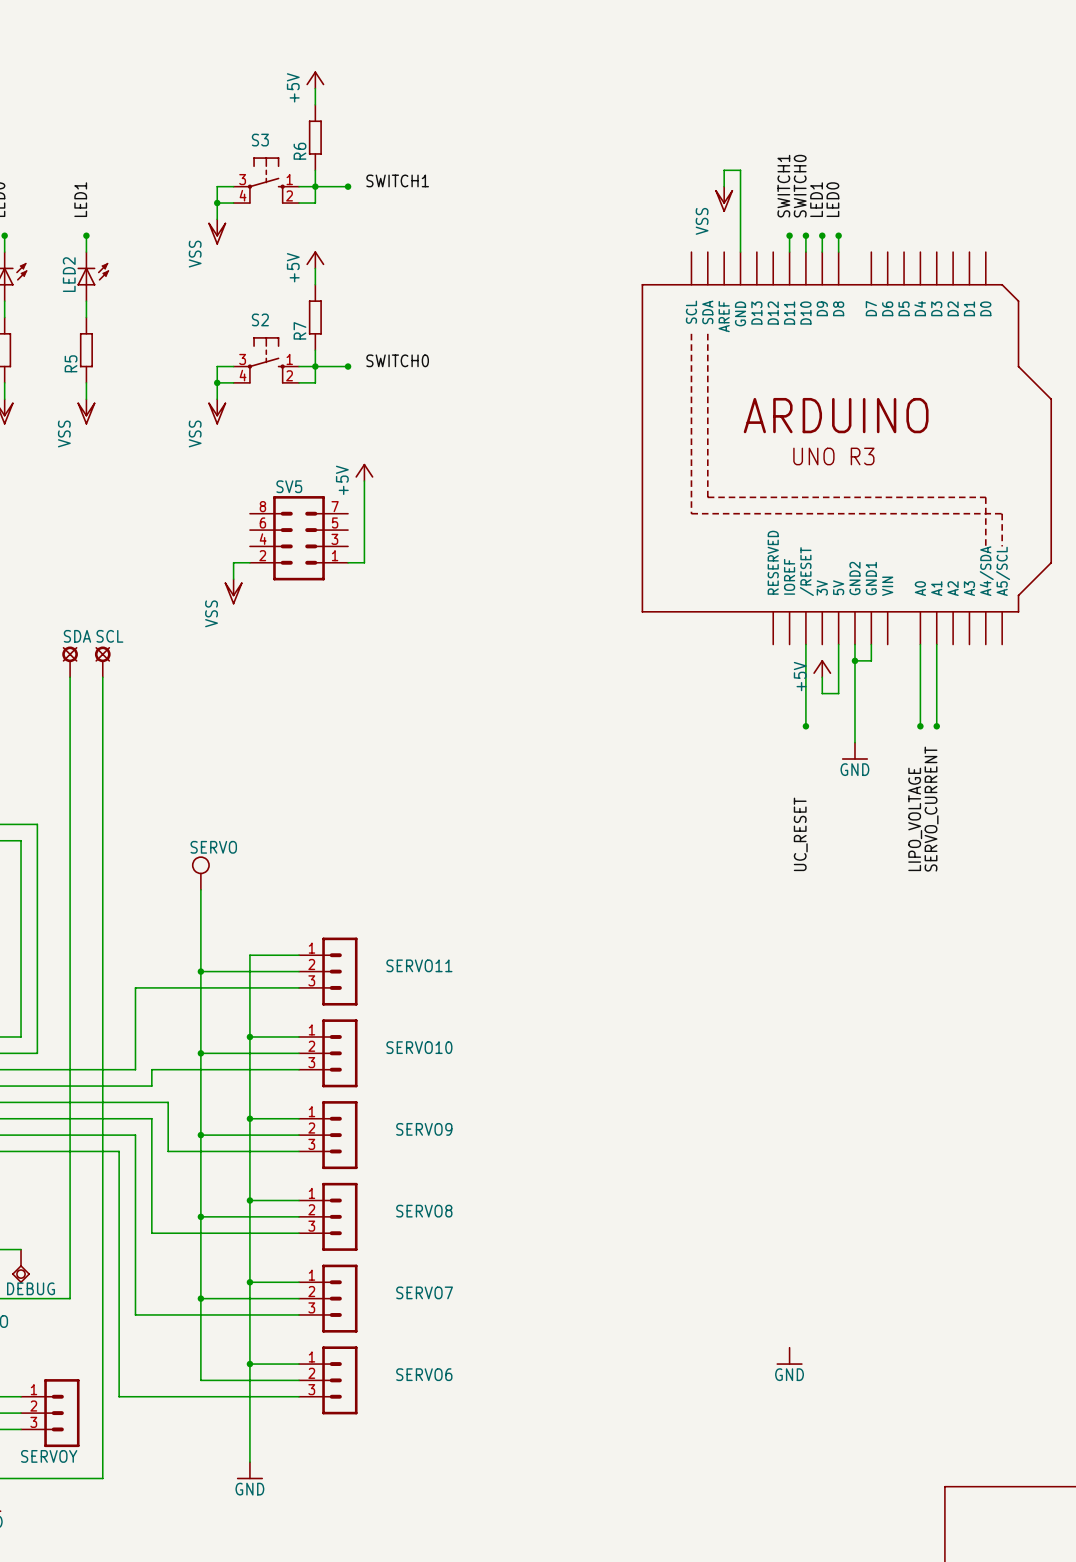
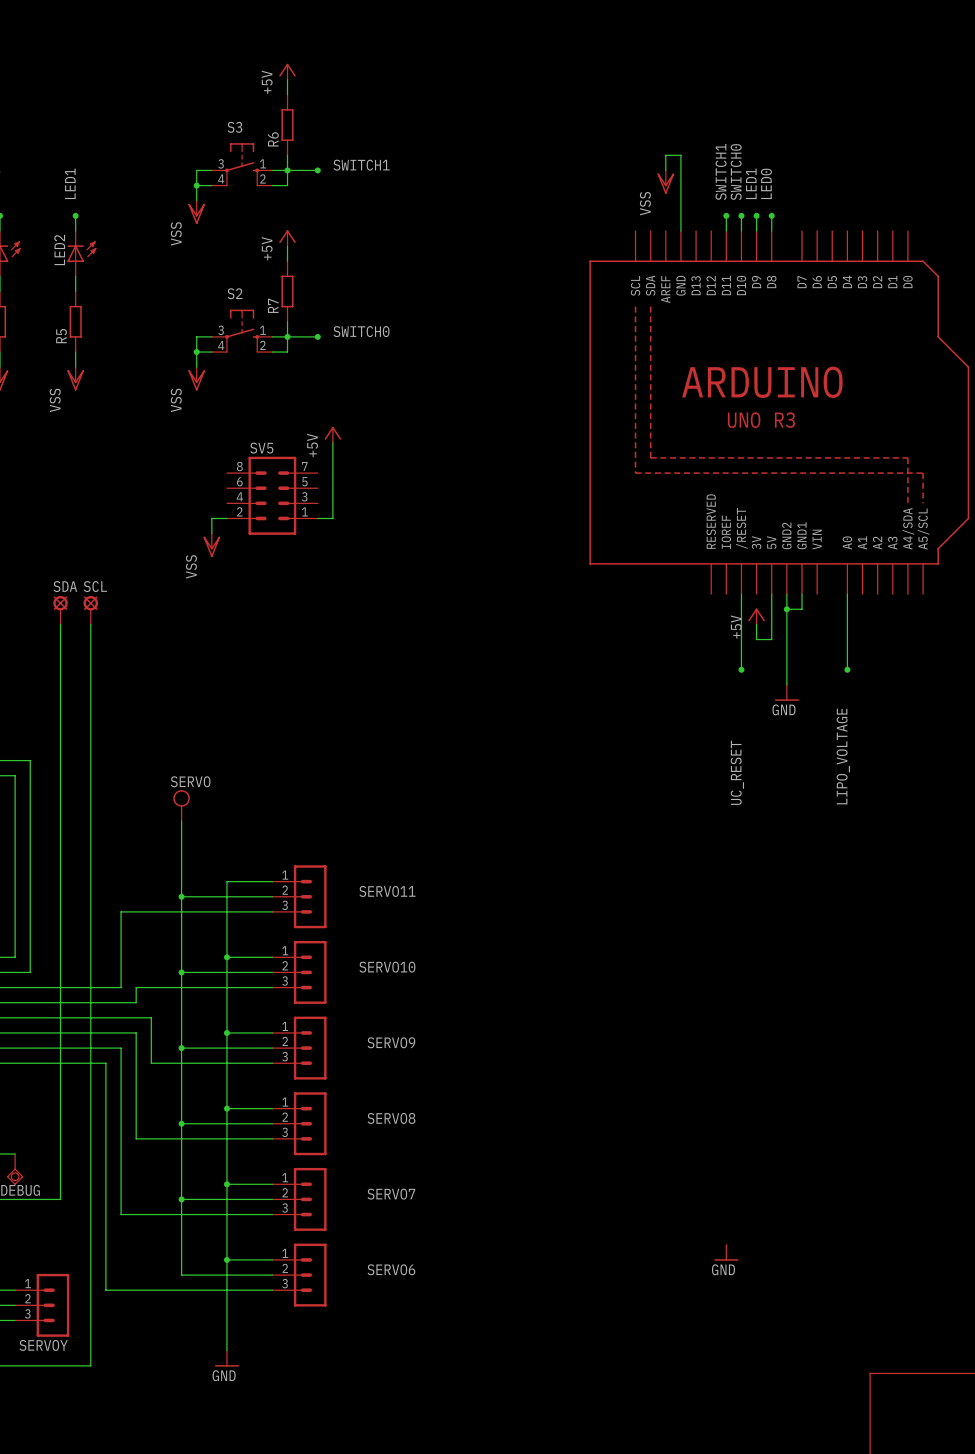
wire: (936, 644) (936, 726) -> none
junction: (936, 726) -> none
label: SERVO_CURRENT (931, 809) -> none

